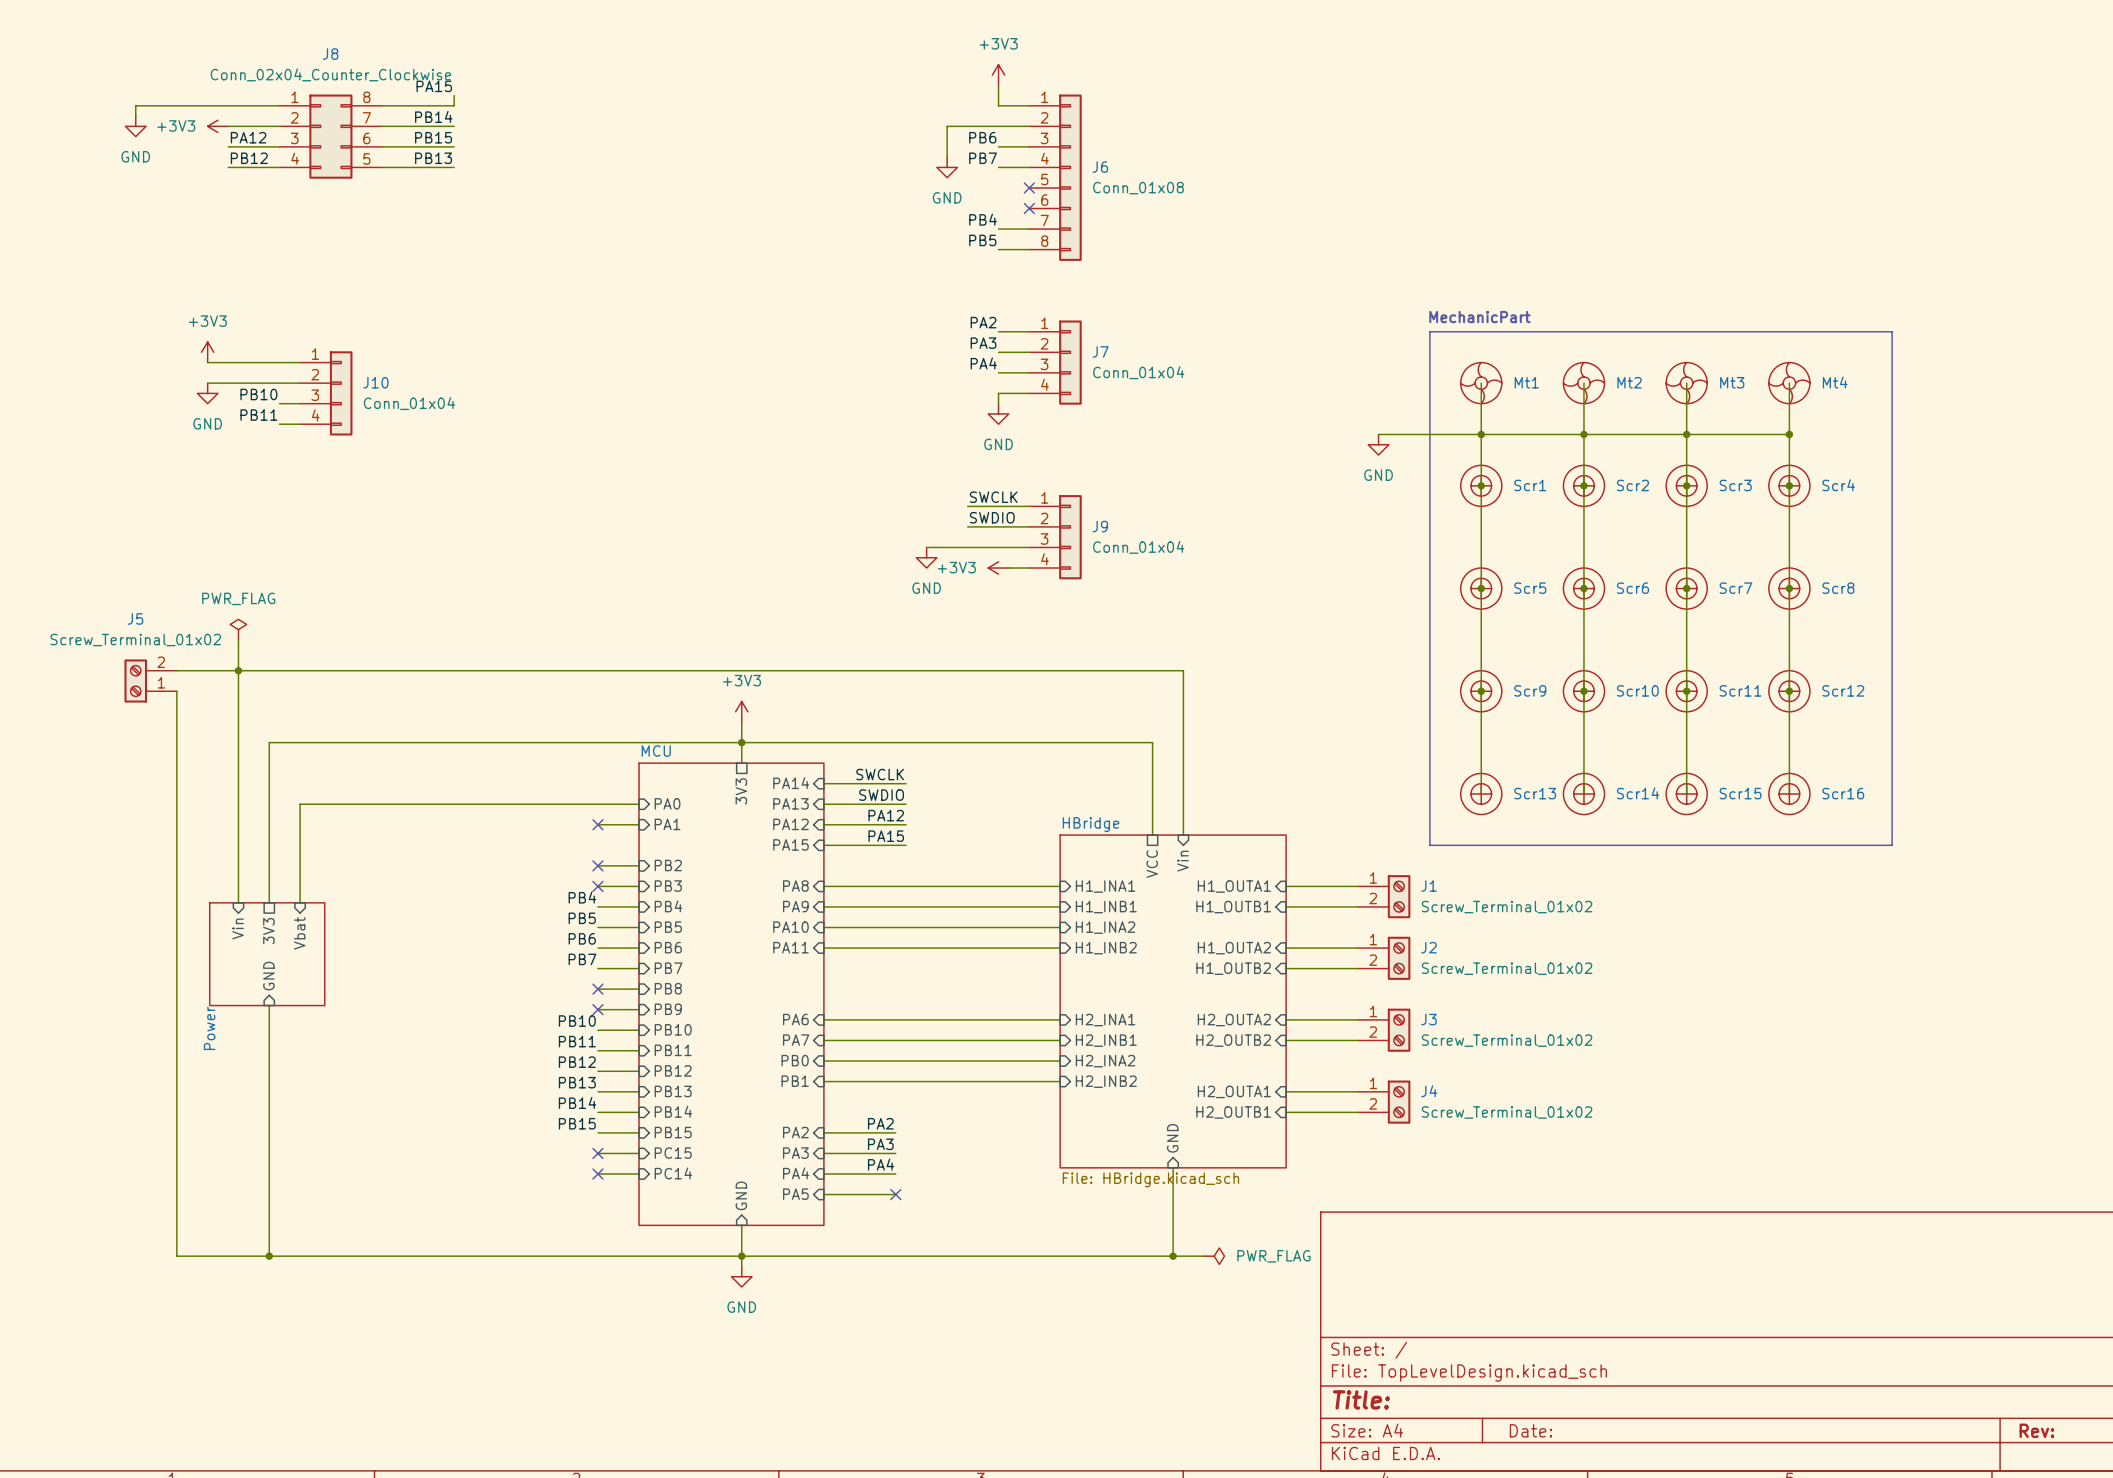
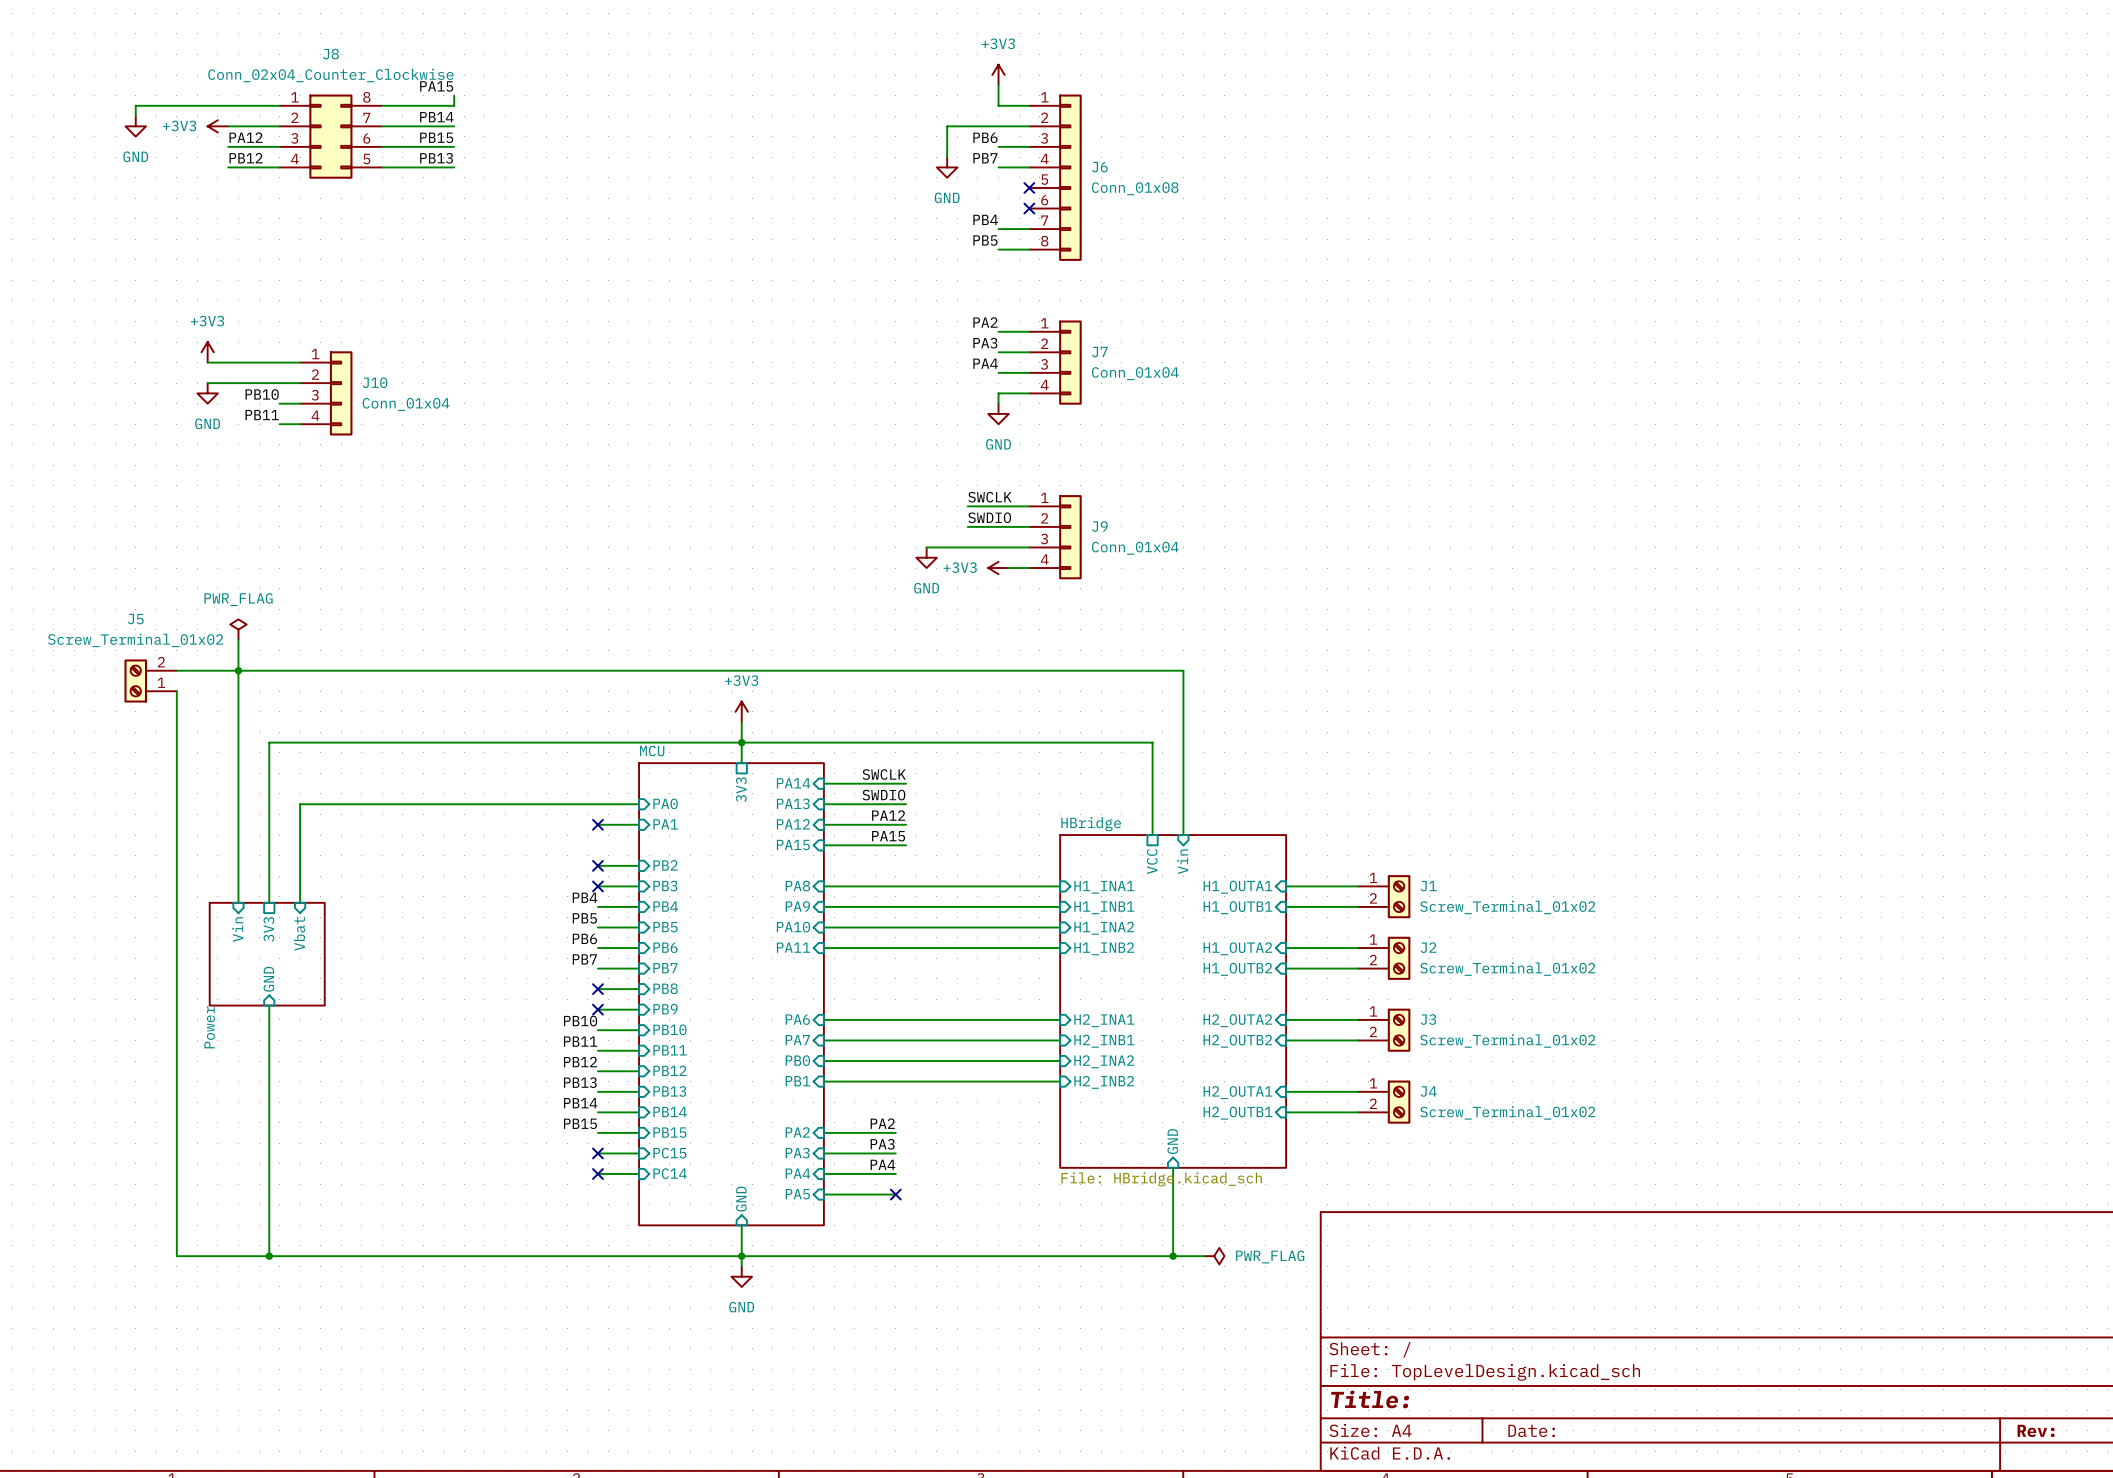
text: MechanicPart (1479, 317) -> none
line: (1429, 331) (1892, 331) (1892, 845) (1429, 845) (1429, 331) -> none
wire: (1481, 383) (1481, 793) -> none
Mt1: (1481, 383) -> none
wire: (1583, 383) (1583, 793) -> none
Mt2: (1583, 383) -> none
wire: (1686, 383) (1686, 793) -> none
Mt3: (1686, 383) -> none
wire: (1789, 383) (1789, 793) -> none
Mt4: (1789, 383) -> none
wire: (1378, 434) (1789, 434) -> none
junction: (1481, 434) -> none
junction: (1583, 434) -> none
junction: (1686, 434) -> none
junction: (1789, 434) -> none
power symbol: GND (1378, 444) -> none
junction: (1481, 485) -> none
Scr1: (1481, 485) -> none
junction: (1583, 485) -> none
Scr2: (1583, 485) -> none
junction: (1686, 485) -> none
Scr3: (1686, 485) -> none
junction: (1789, 485) -> none
Scr4: (1789, 485) -> none
junction: (1481, 588) -> none
Scr5: (1481, 588) -> none
junction: (1583, 588) -> none
Scr6: (1583, 588) -> none
junction: (1686, 588) -> none
Scr7: (1686, 588) -> none
junction: (1789, 588) -> none
Scr8: (1789, 588) -> none
junction: (1481, 691) -> none
Scr9: (1481, 691) -> none
junction: (1583, 691) -> none
Scr10: (1583, 691) -> none
junction: (1686, 691) -> none
Scr11: (1686, 691) -> none
junction: (1789, 691) -> none
Scr12: (1789, 691) -> none
Scr13: (1481, 793) -> none
Scr14: (1583, 793) -> none
Scr15: (1686, 793) -> none
Scr16: (1789, 793) -> none

